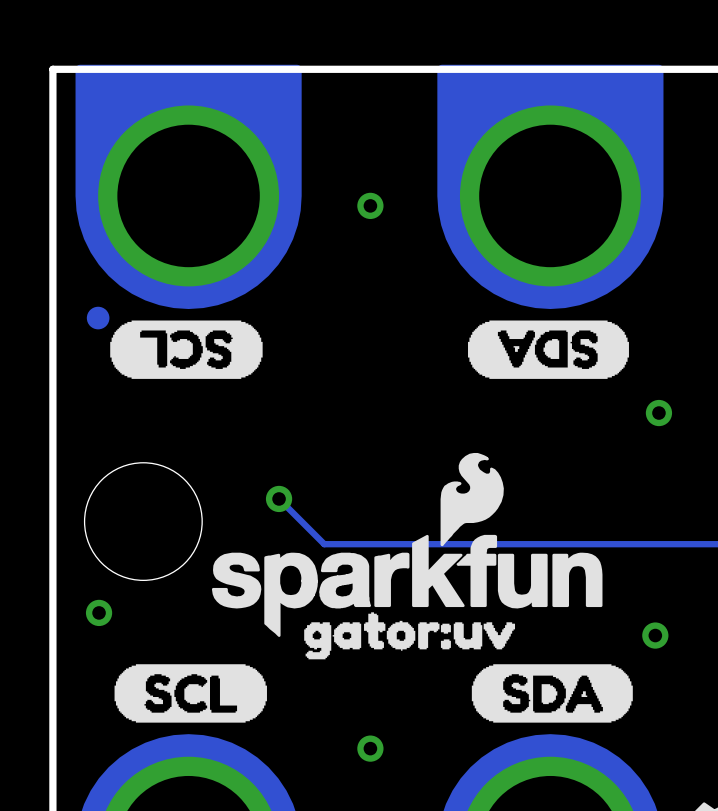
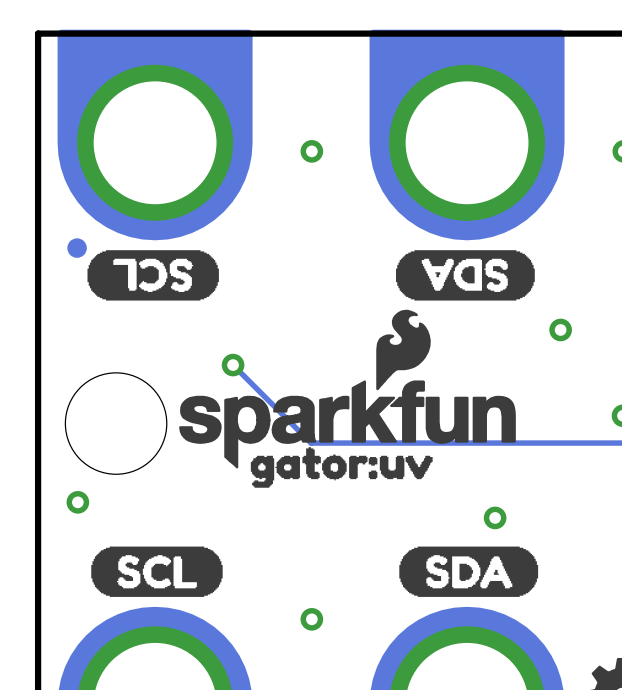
track: (279, 498) (324, 544) (369, 544) -> (233, 365) (311, 443)
via position: (279, 498) -> (233, 365)
drawing position: (407, 544) -> (347, 389)
drawing position: (409, 635) -> (341, 467)
via position: (655, 635) -> (495, 517)

